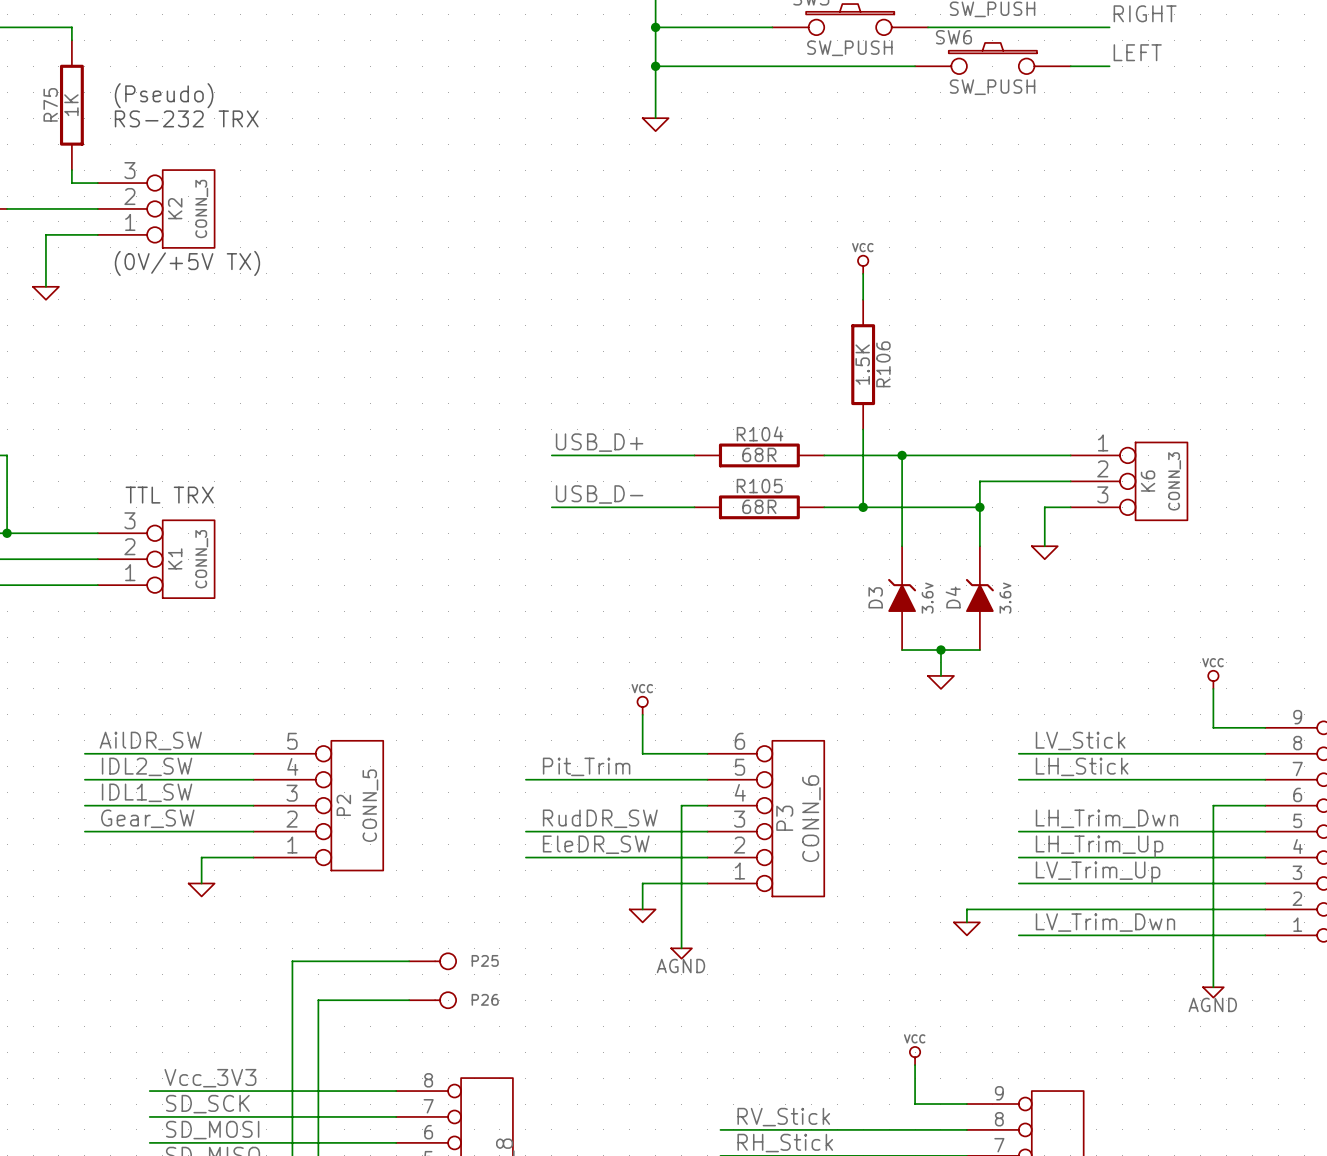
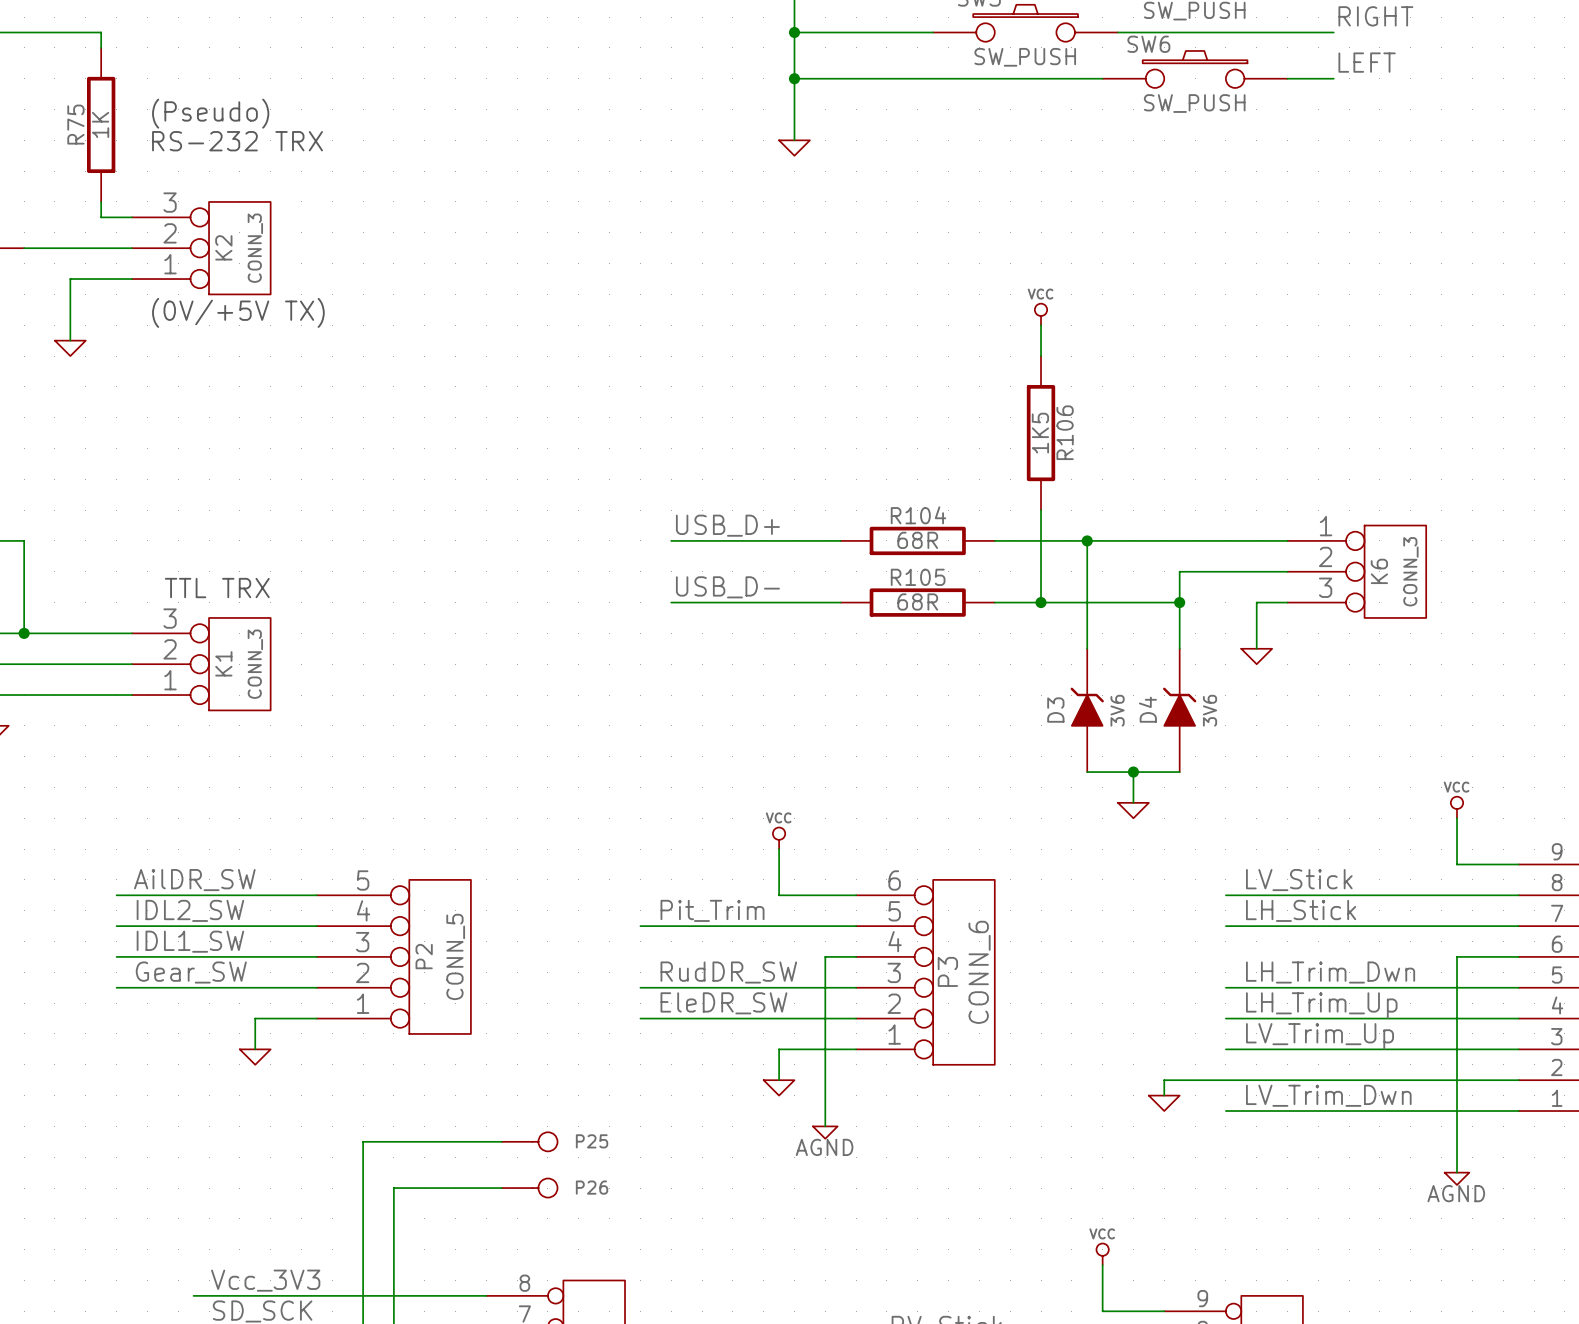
R106 value: 1.5K (862, 364) -> 1K5 (1040, 433)
D3 value: 3.6v (927, 598) -> 3V6 (1117, 710)
D4 value: 3.6v (1005, 598) -> 3V6 (1210, 710)

